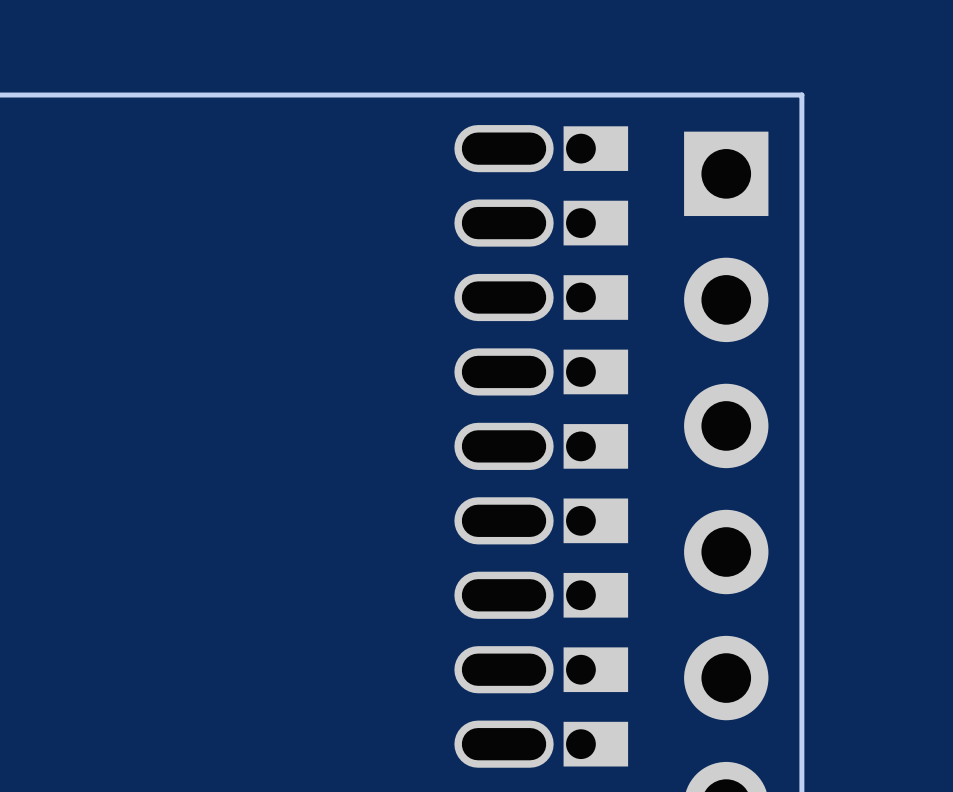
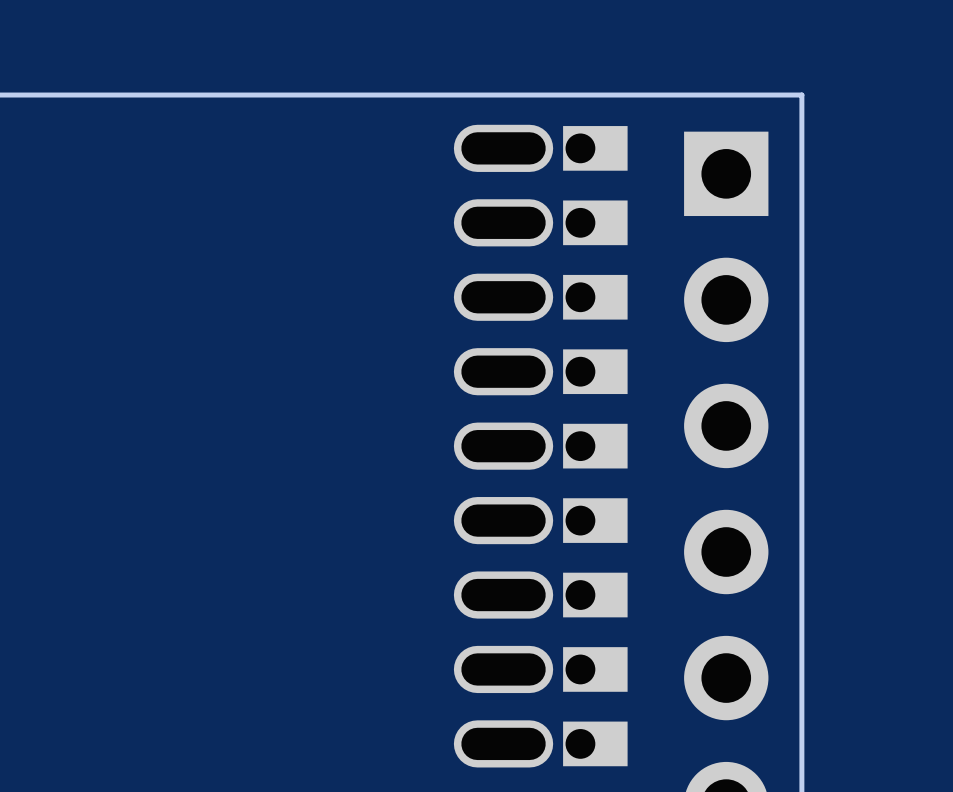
part: (541, 148) -> none
part: (541, 223) -> none
part: (541, 297) -> none
part: (541, 371) -> none
part footprint: [454, 422, 629, 470] -> [453, 124, 628, 768]
part: (541, 520) -> none
part: (541, 595) -> none
part: (541, 669) -> none
part: (541, 744) -> none

